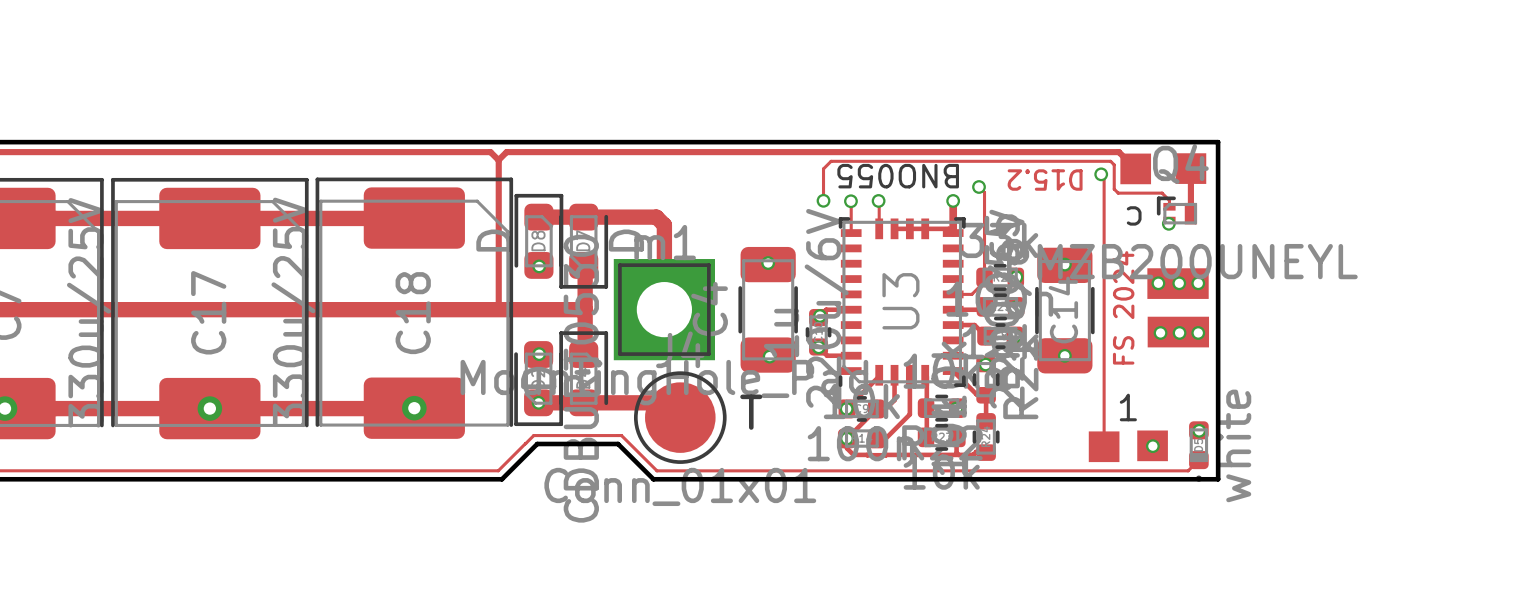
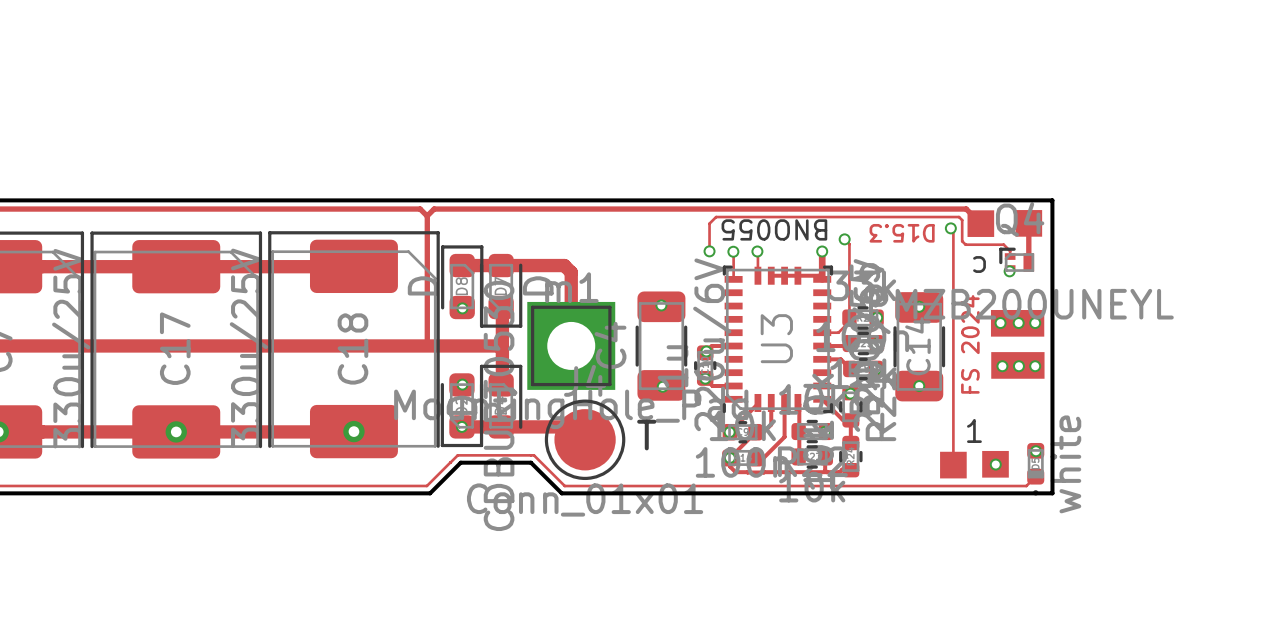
text: D15.2 (1045, 180) -> D15.3 (902, 233)

